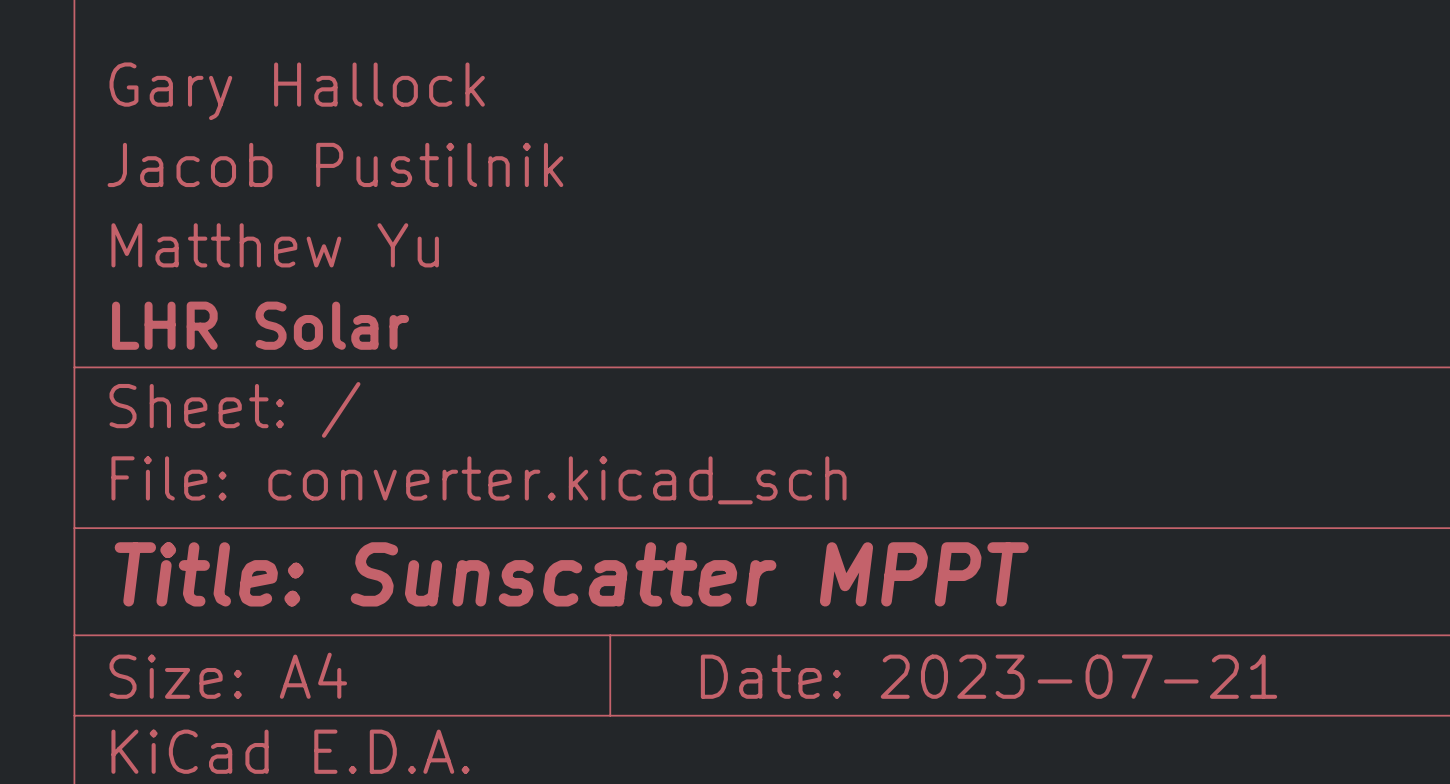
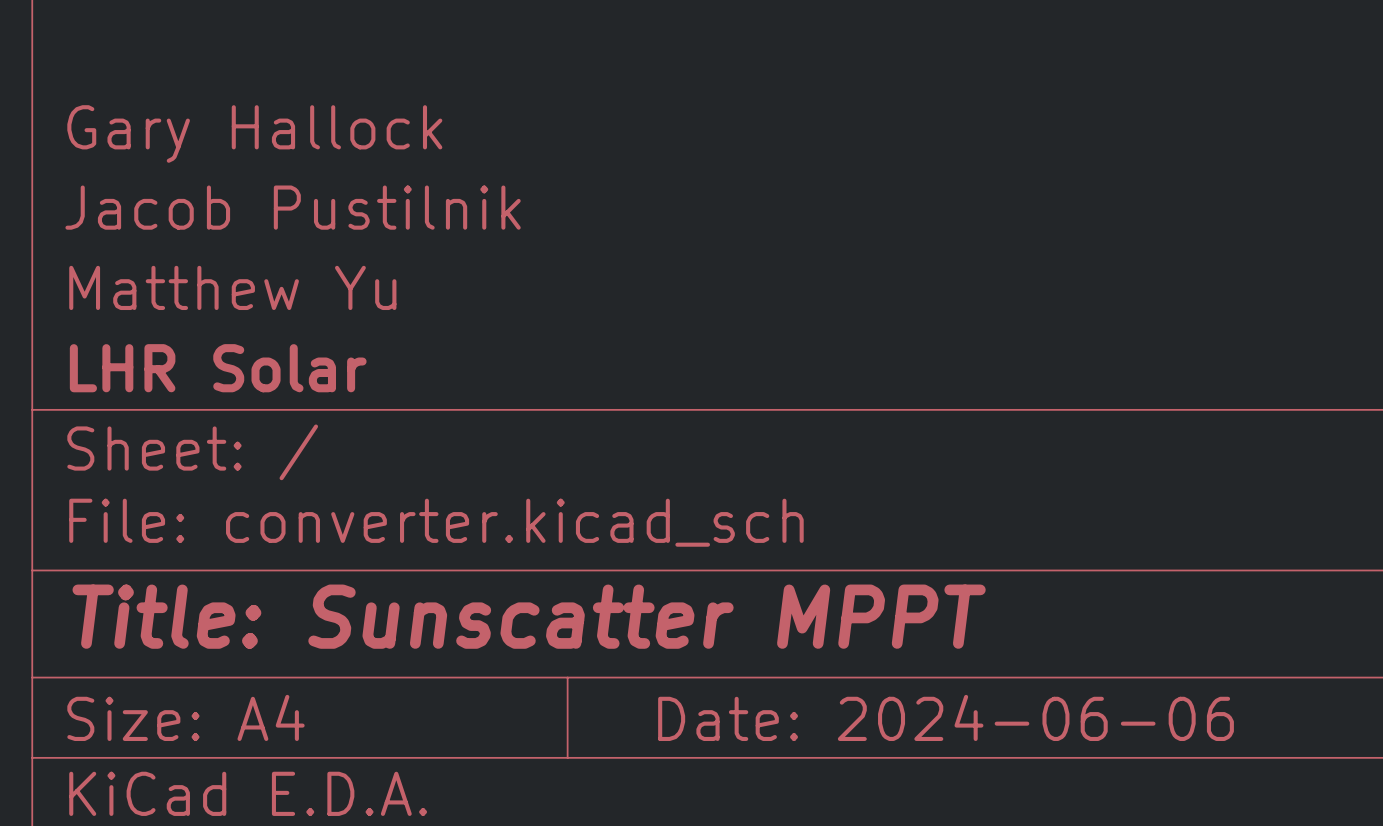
title block: Date: 2023-07-21 (989, 676) -> Date: 2024-06-06 (946, 717)

